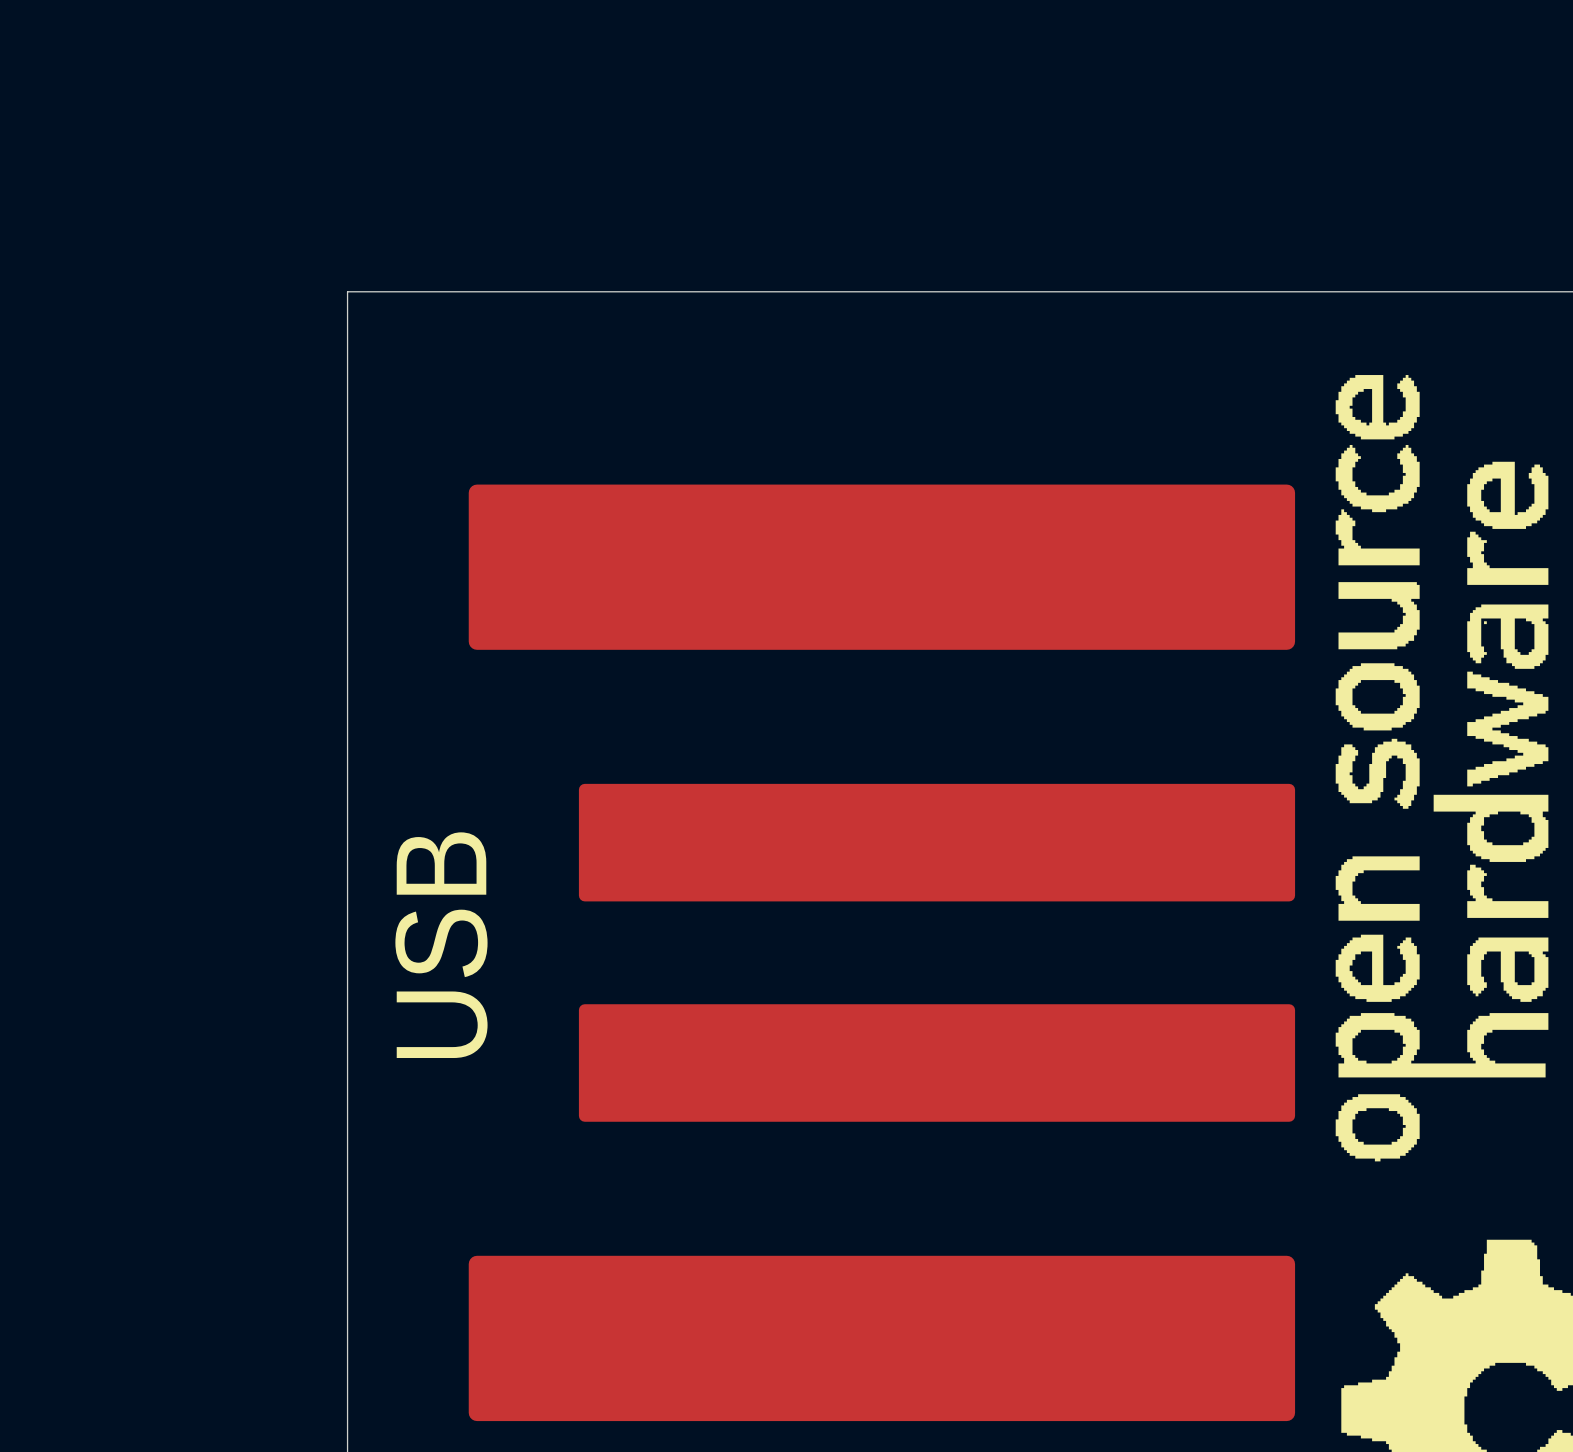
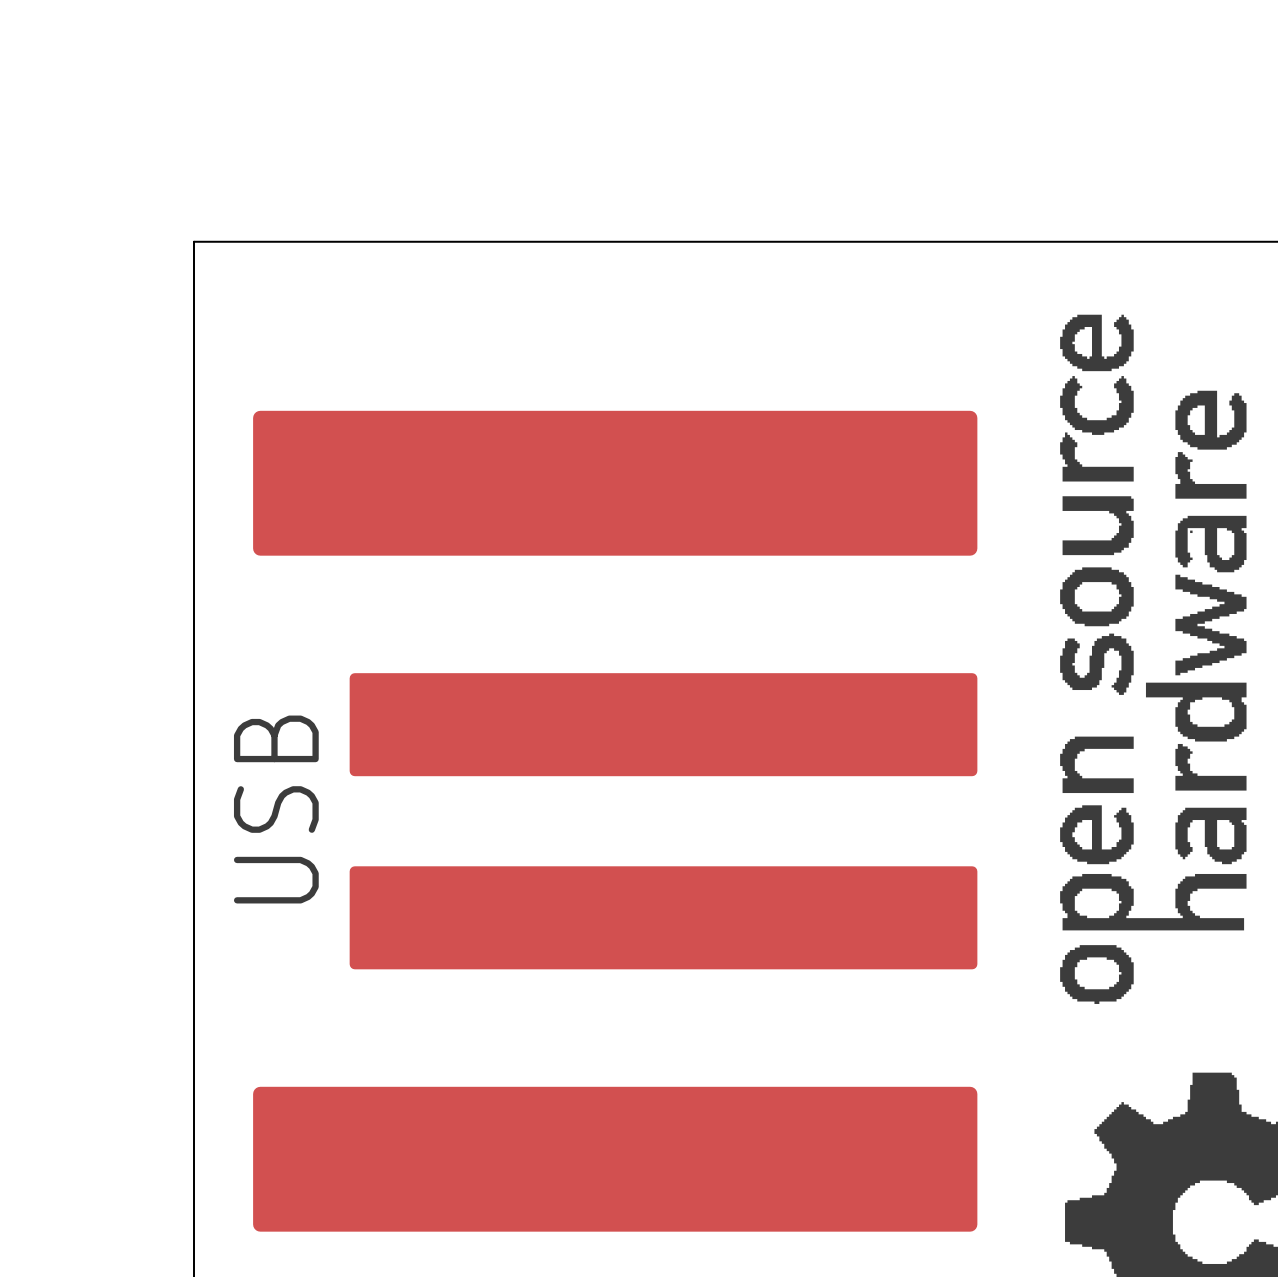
USB position: (881, 952) -> (615, 821)

